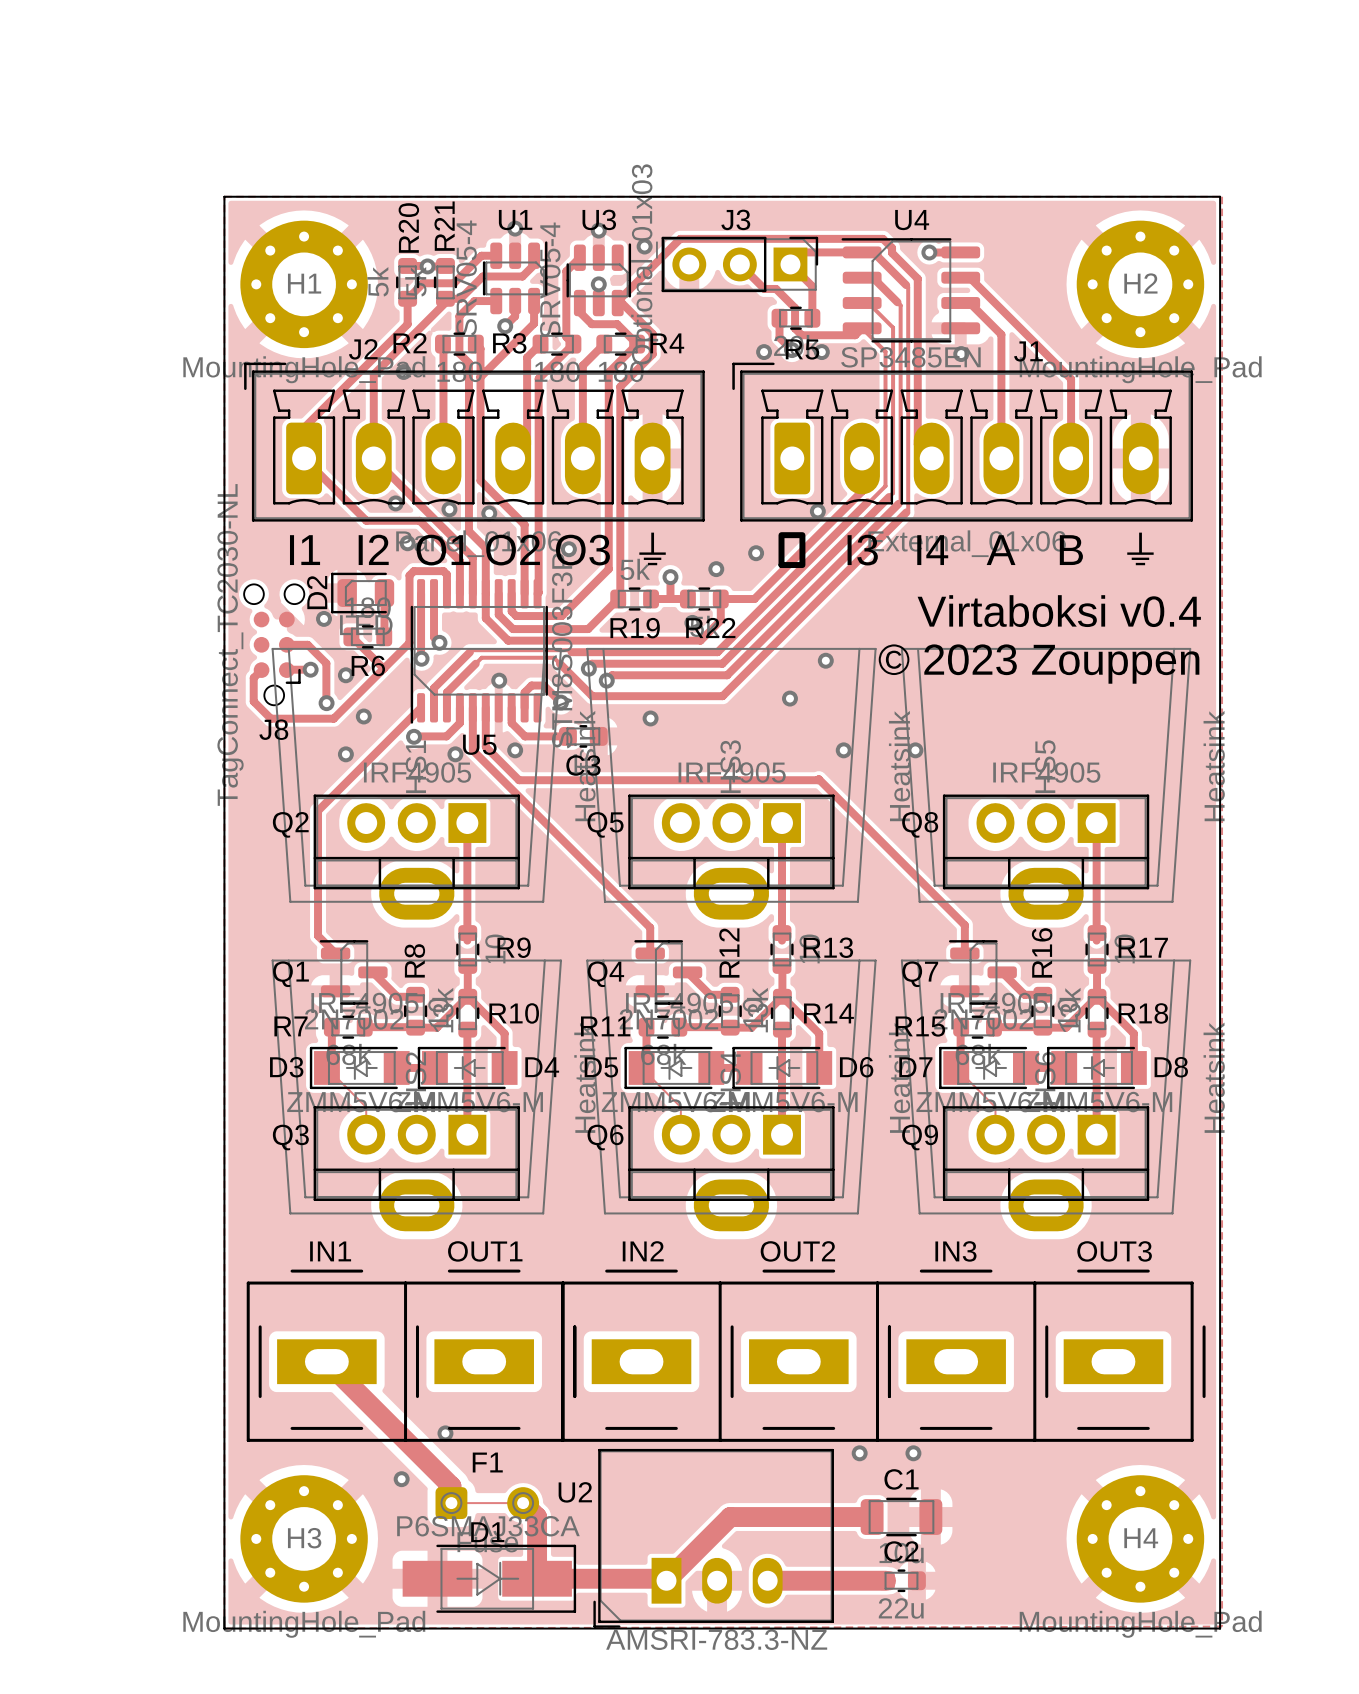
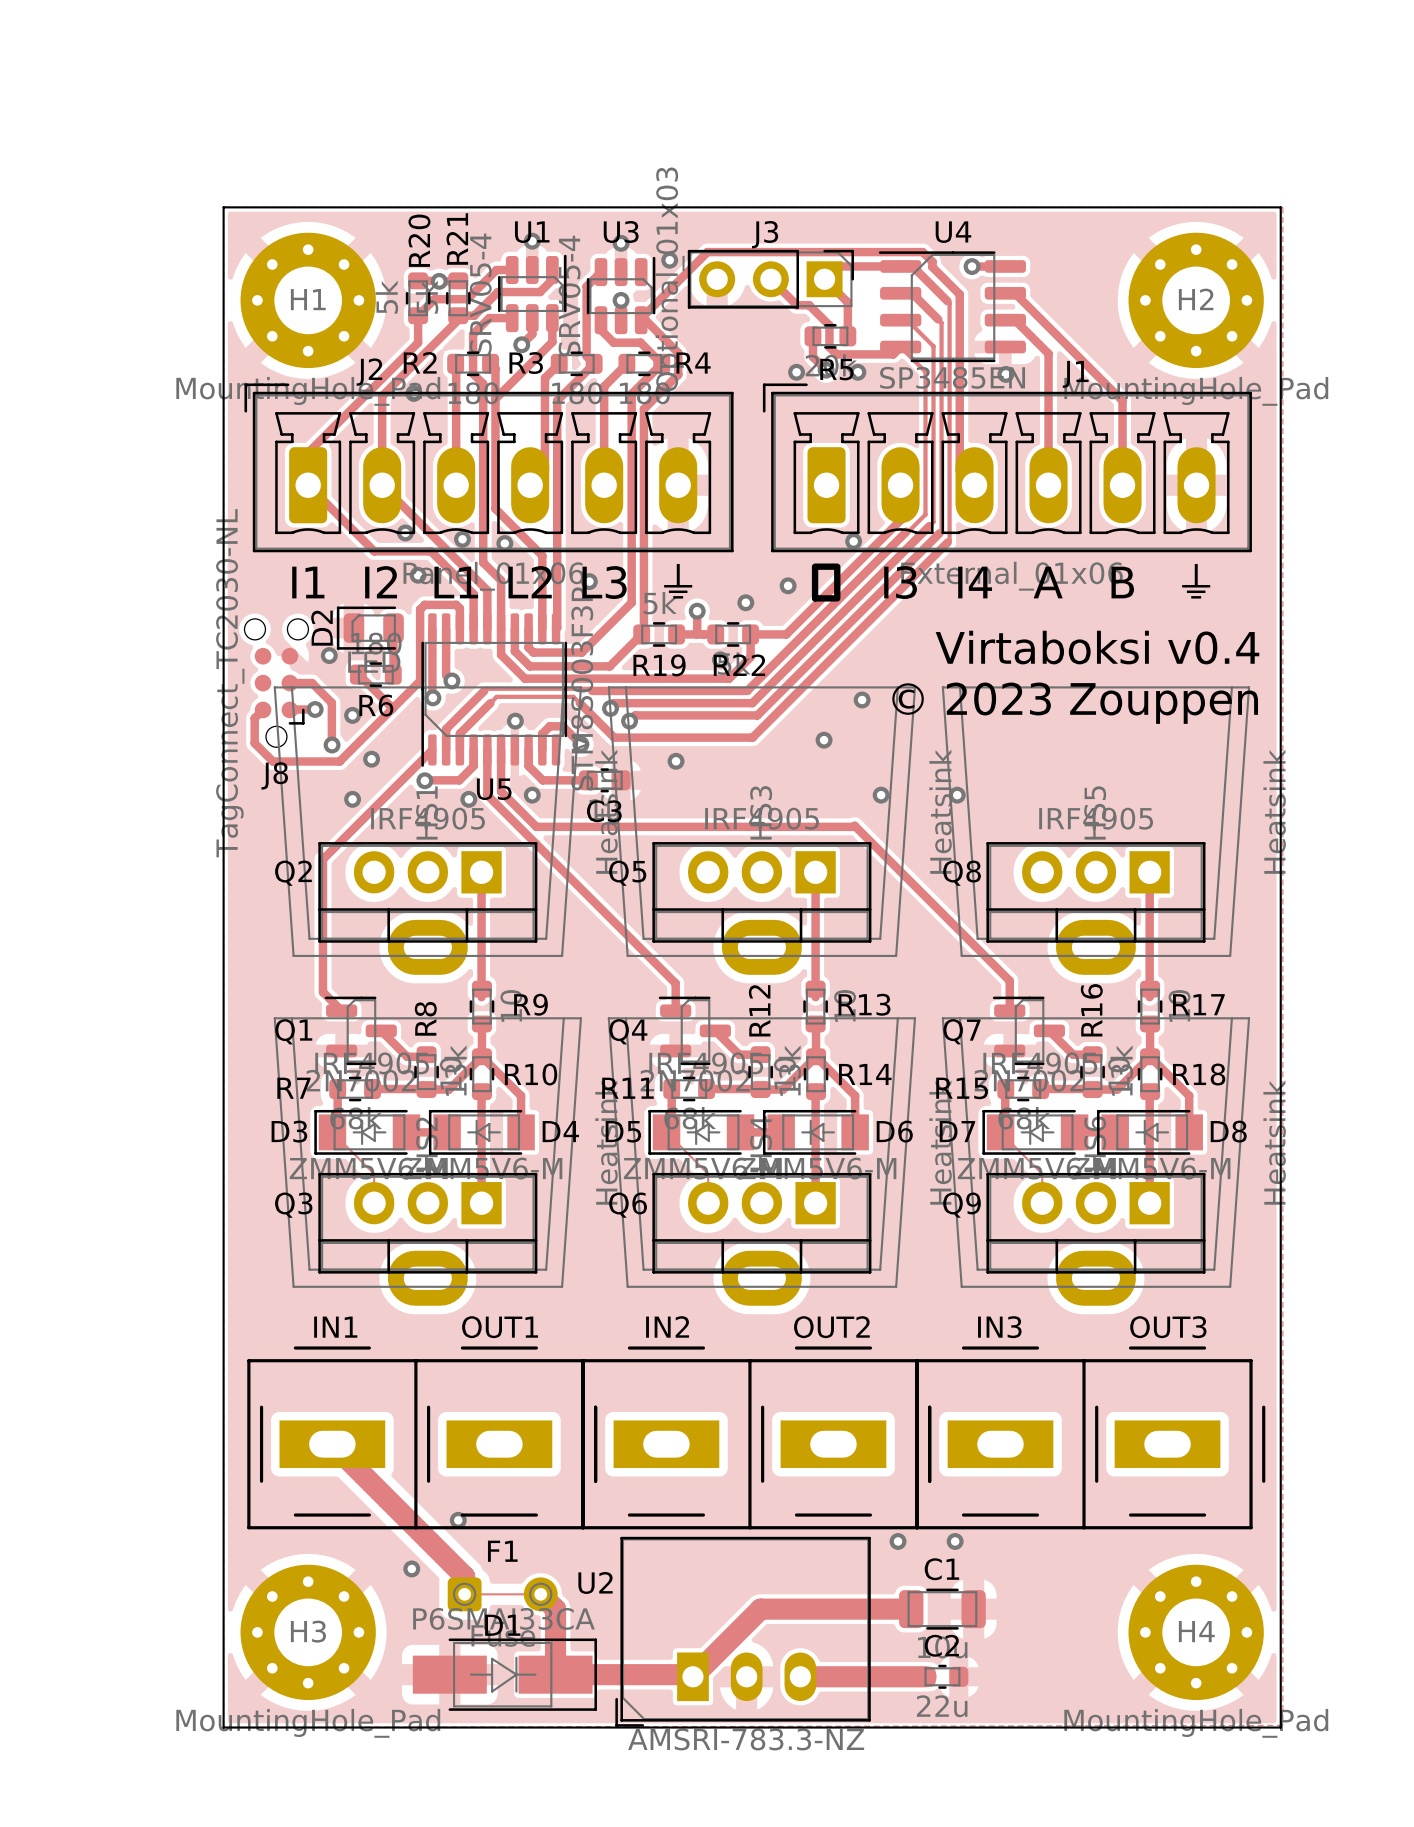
text: O1 (443, 550) -> L1 (456, 582)
text: O2 (513, 550) -> L2 (530, 582)
text: O3 (582, 550) -> L3 (604, 582)

